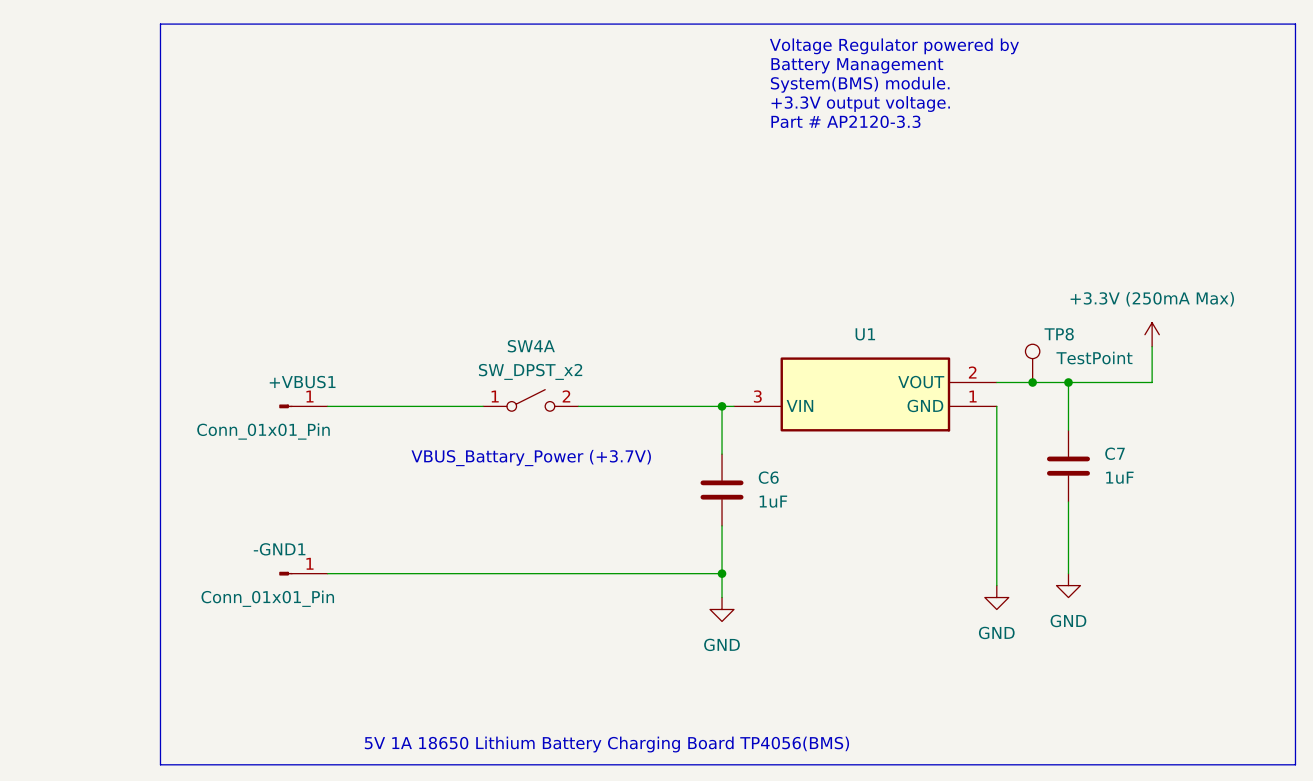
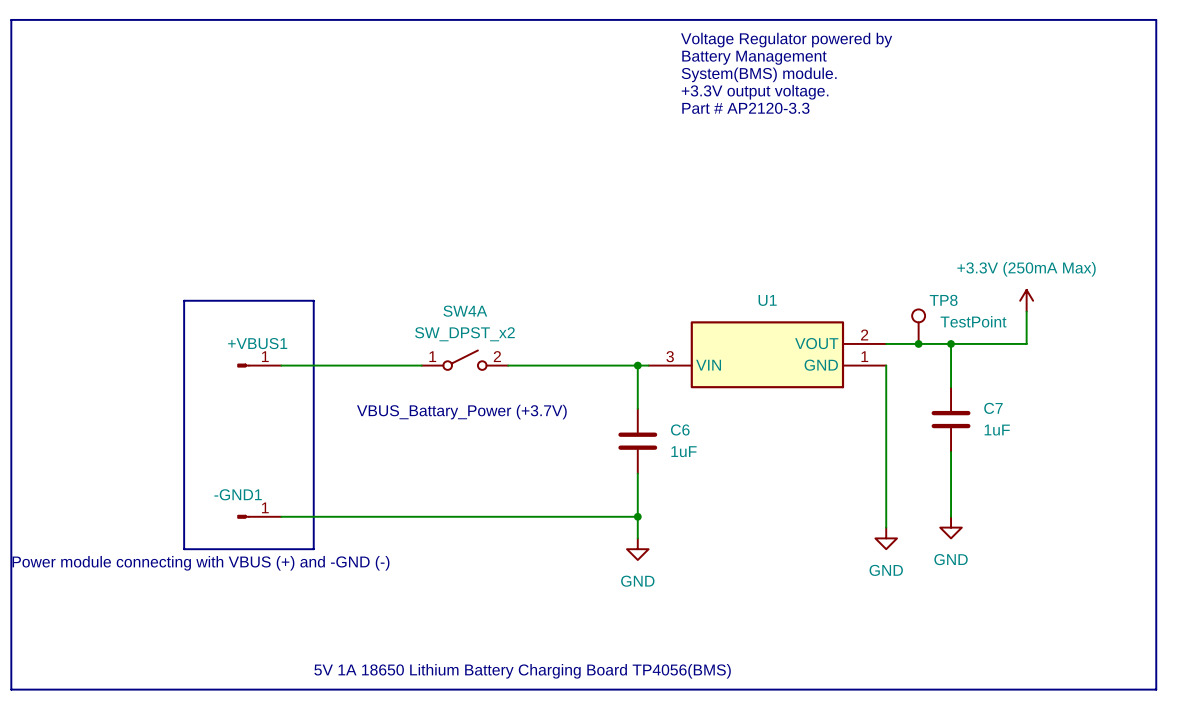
line: (160, 24) (160, 764) -> (130, 19) (11, 19) (11, 689) (130, 689)
line: none -> (184, 300) (313, 300) (313, 549) (184, 549) (184, 300)
+VBUS1 value: Conn_01x01_Pin (263, 431) -> none
-GND1 value: Conn_01x01_Pin (267, 598) -> none
text: none -> Power module connecting with VBUS (+) and -GND (-) (201, 563)

